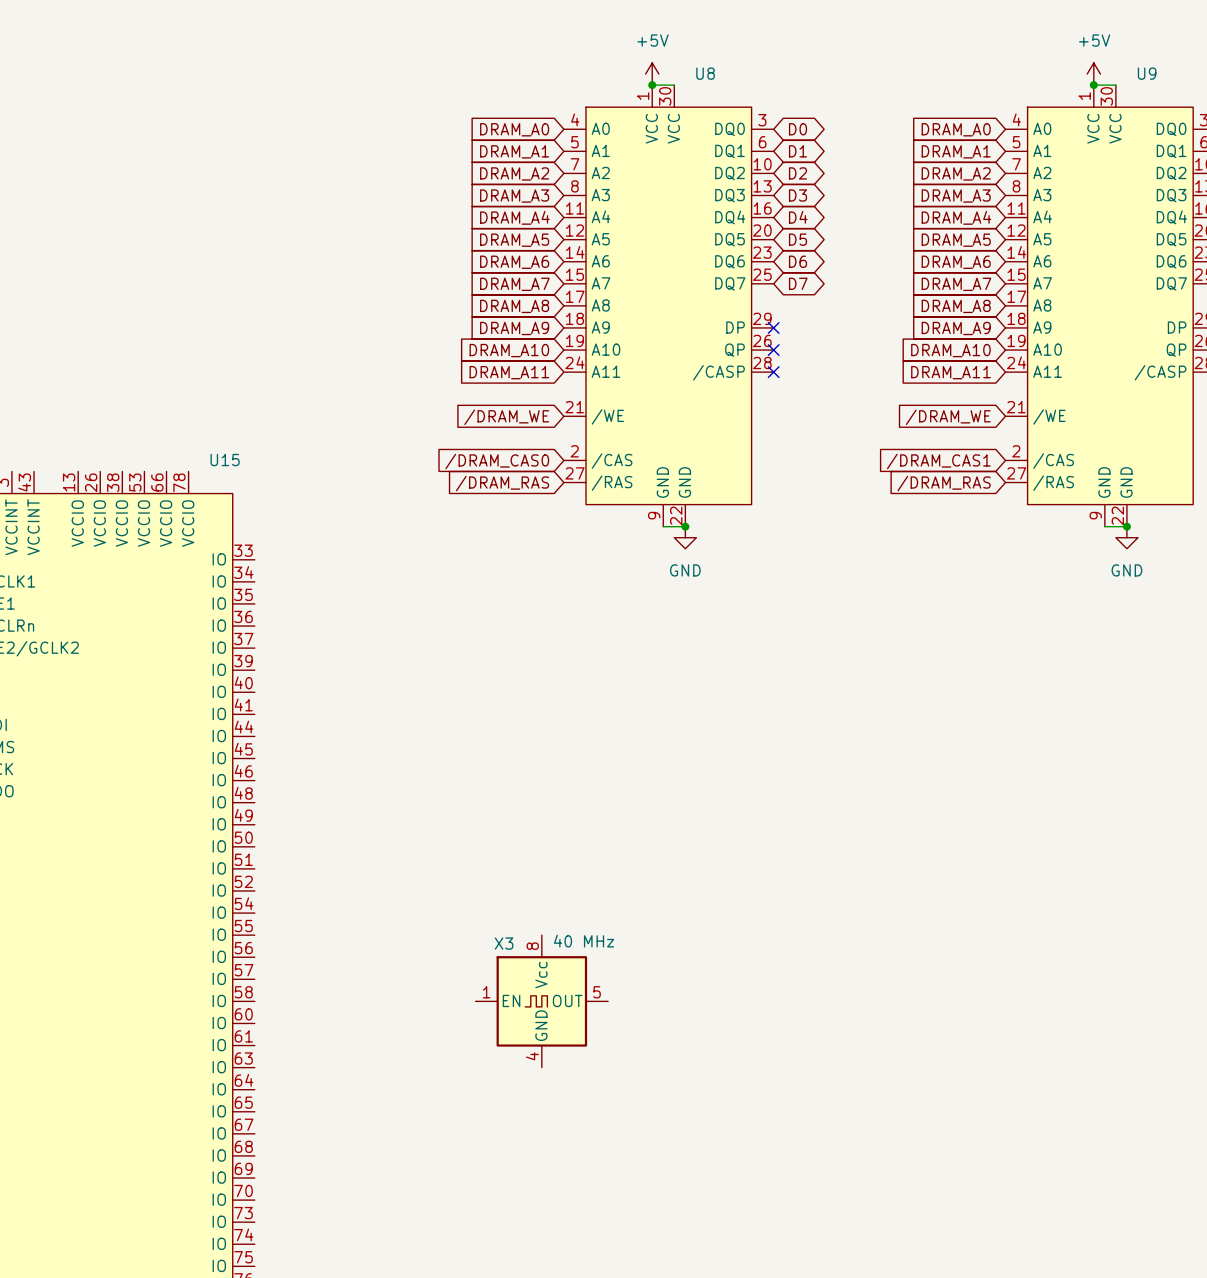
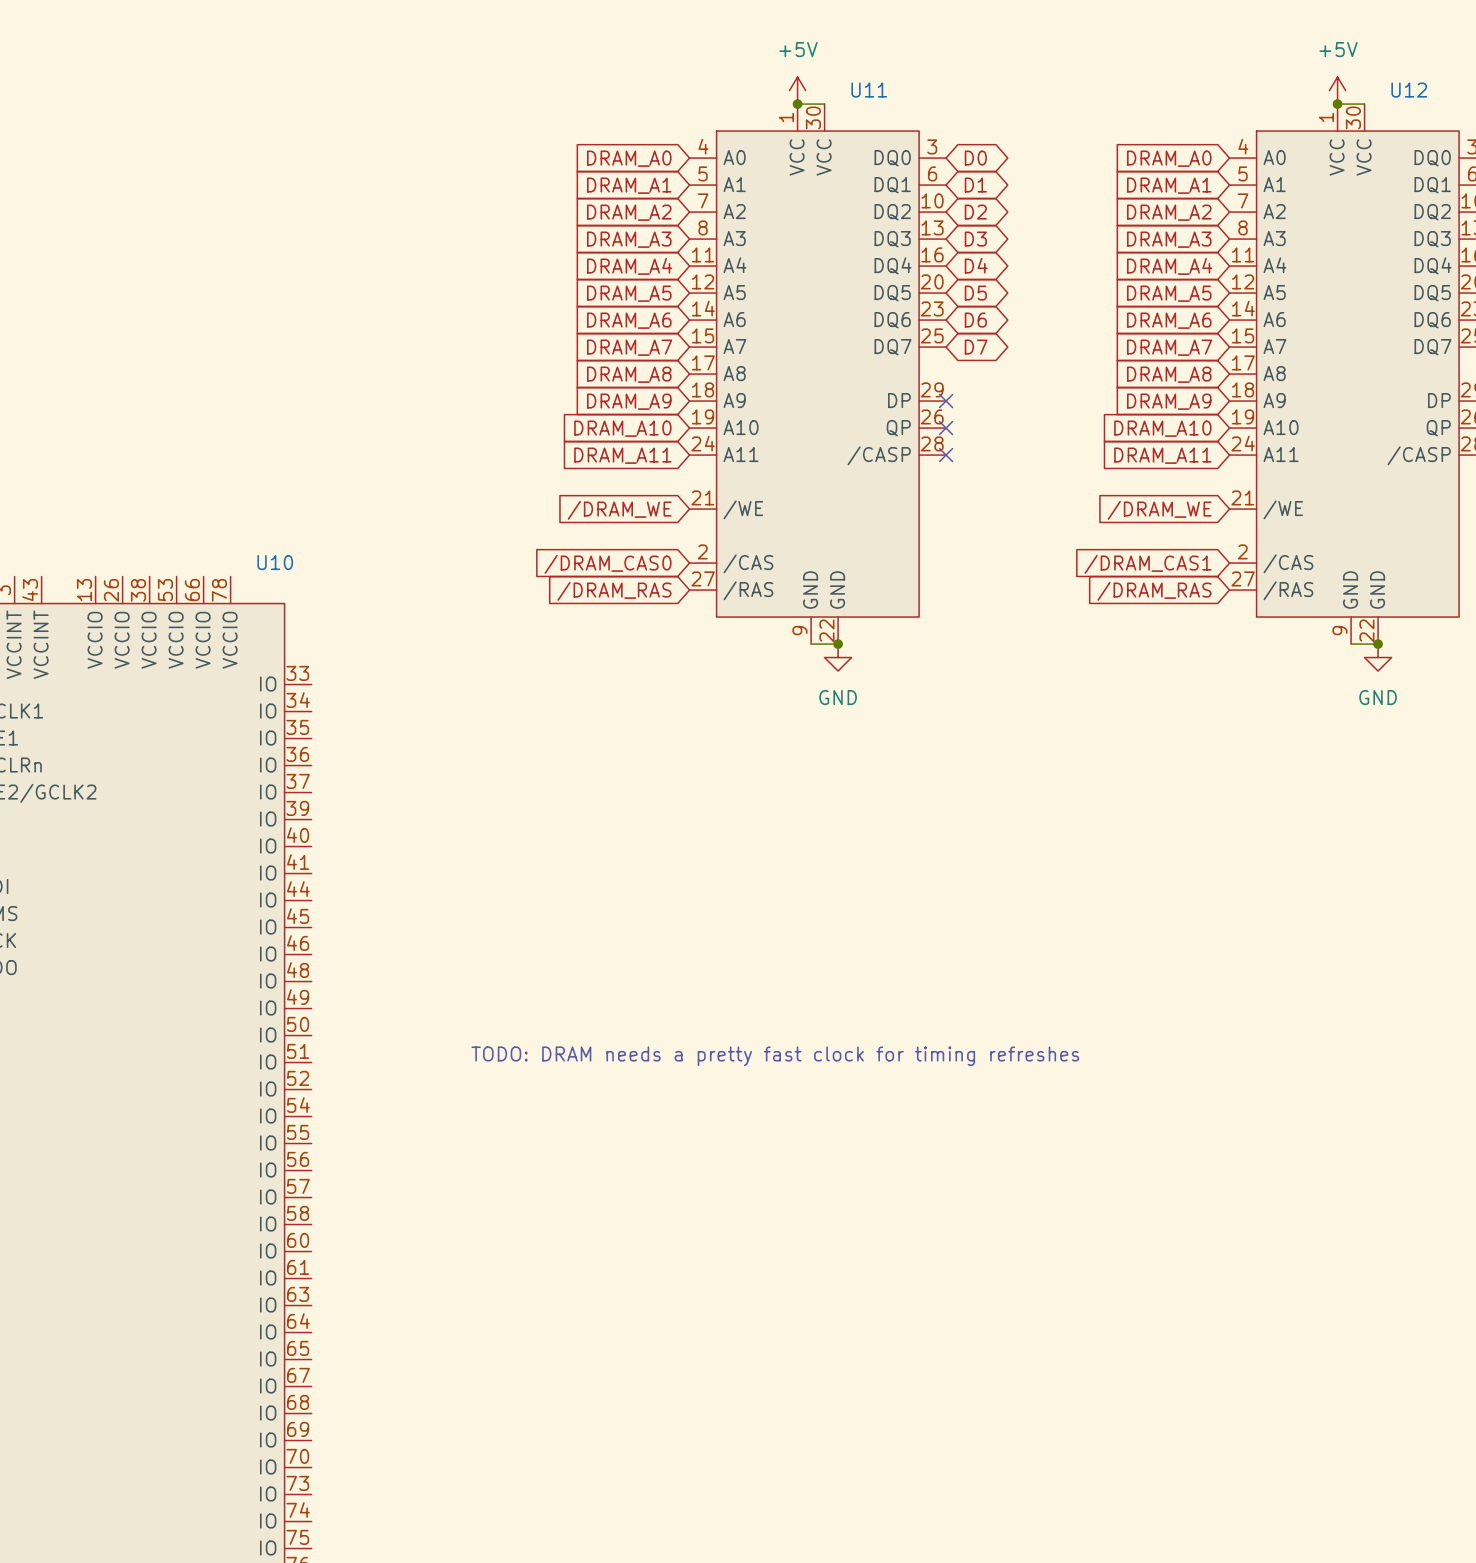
U8 name: U8 (705, 73) -> U11 (869, 90)
U9 name: U9 (1147, 73) -> U12 (1409, 90)
U15 name: U15 (225, 460) -> U10 (275, 562)
text: none -> TODO: DRAM needs a pretty fast clock for timing refreshes (775, 1056)
X3: 40 MHz (541, 1001) -> none

